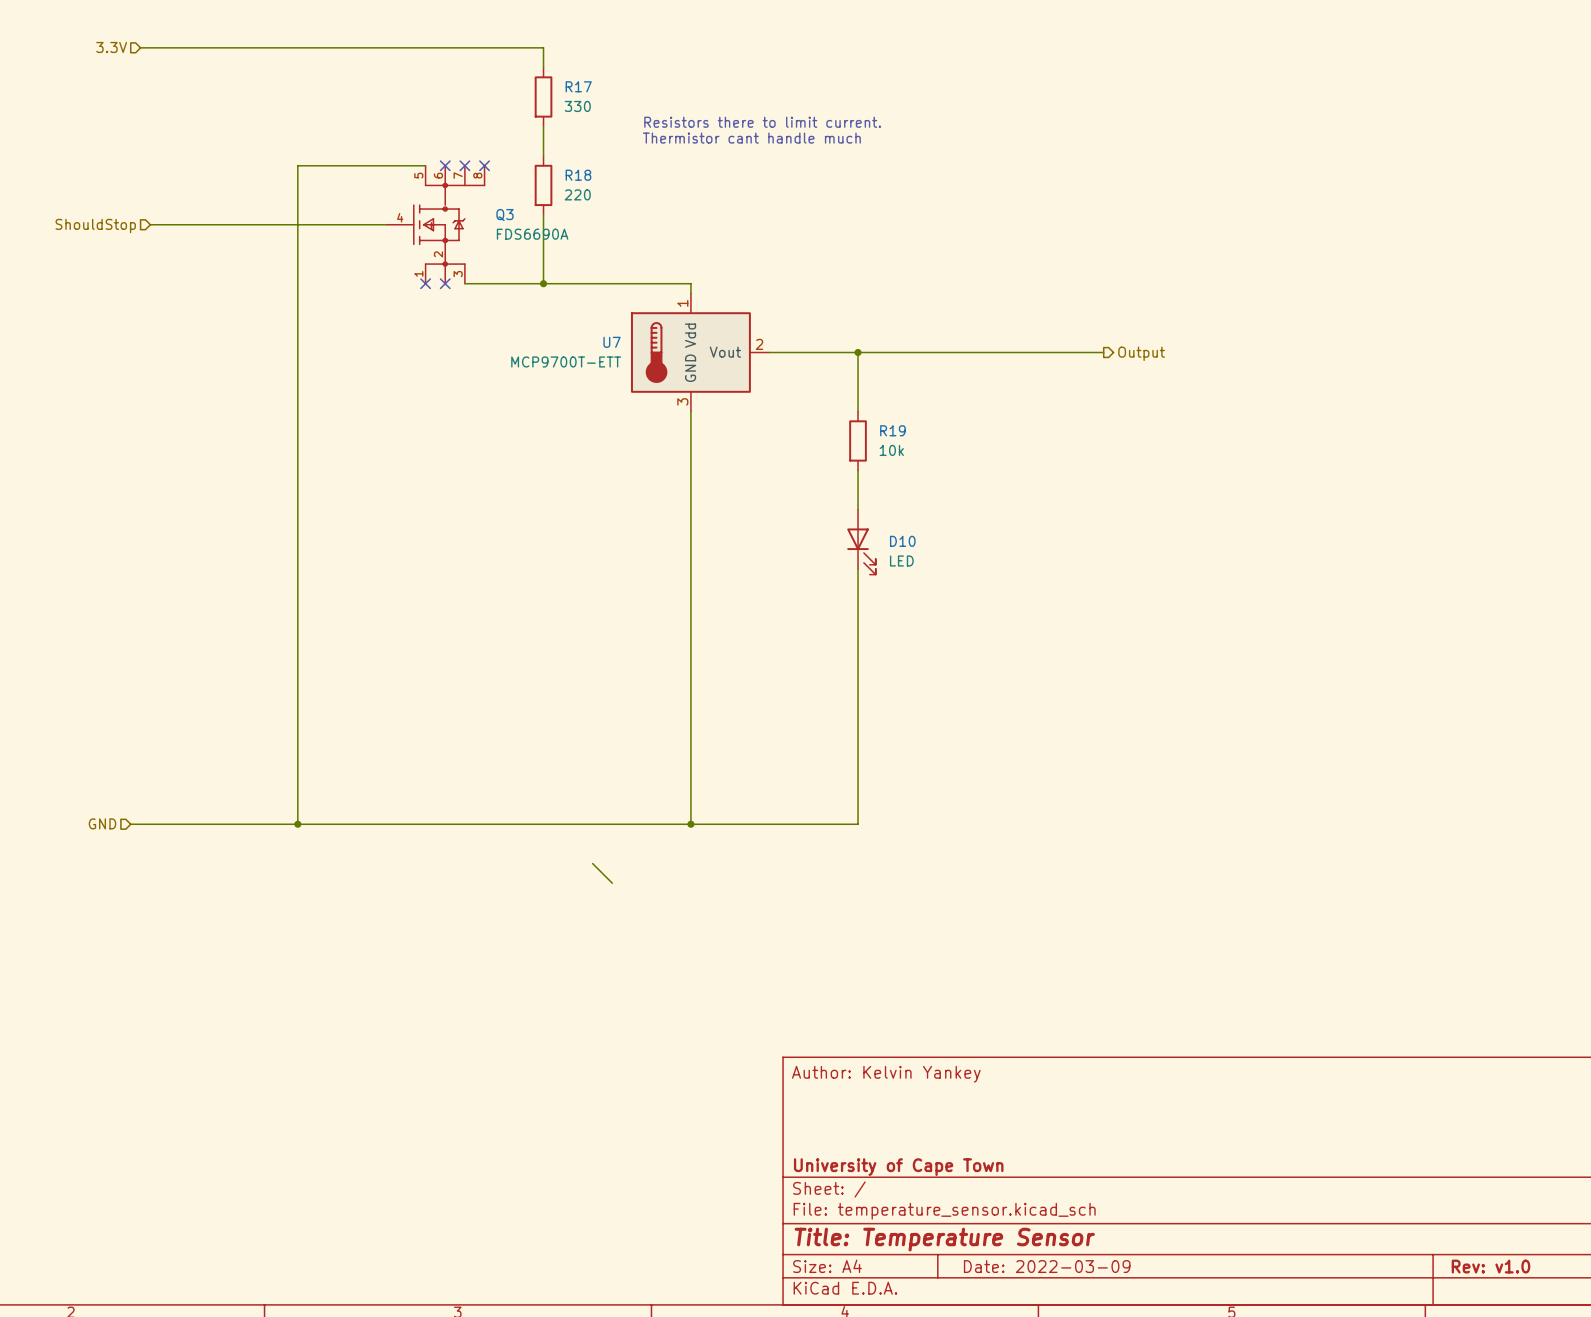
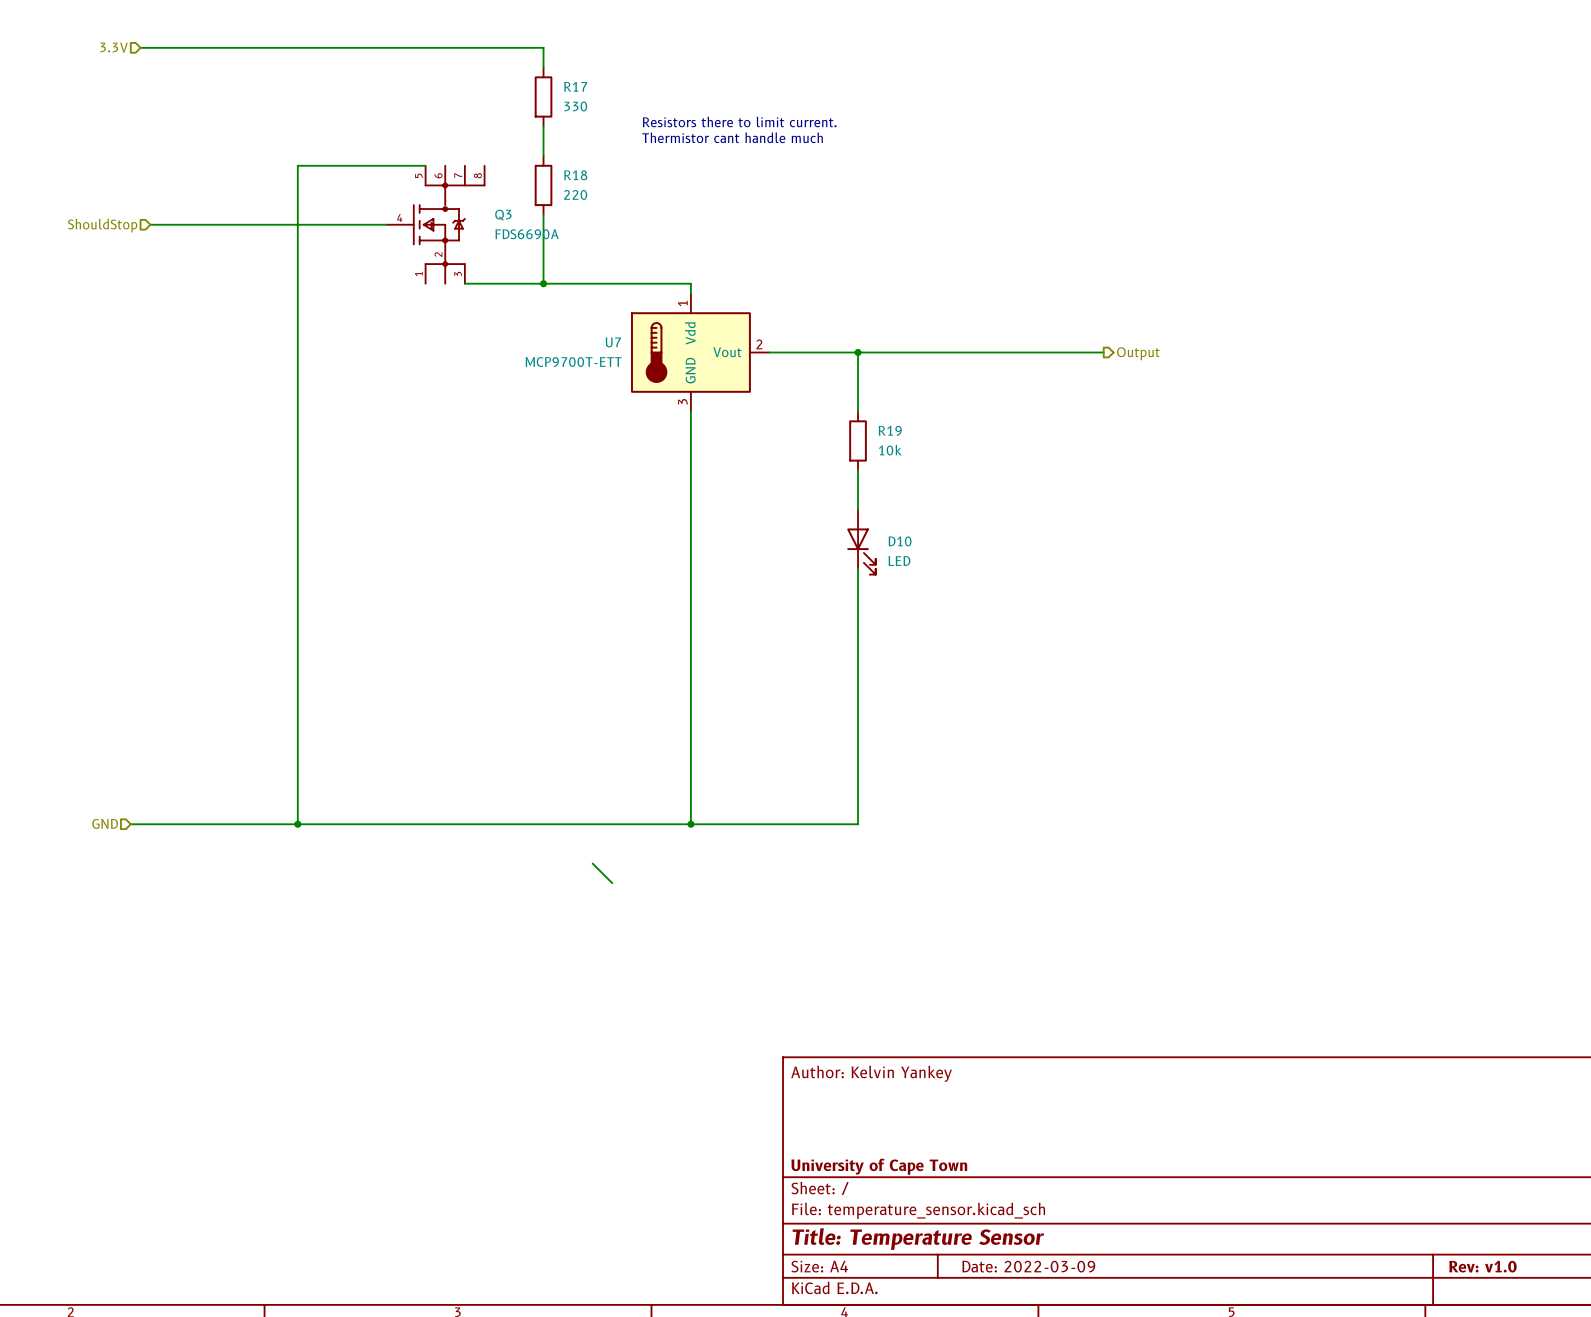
no-connect mark: (445, 165) -> none
no-connect mark: (464, 165) -> none
no-connect mark: (484, 165) -> none
no-connect mark: (425, 283) -> none
no-connect mark: (445, 283) -> none

